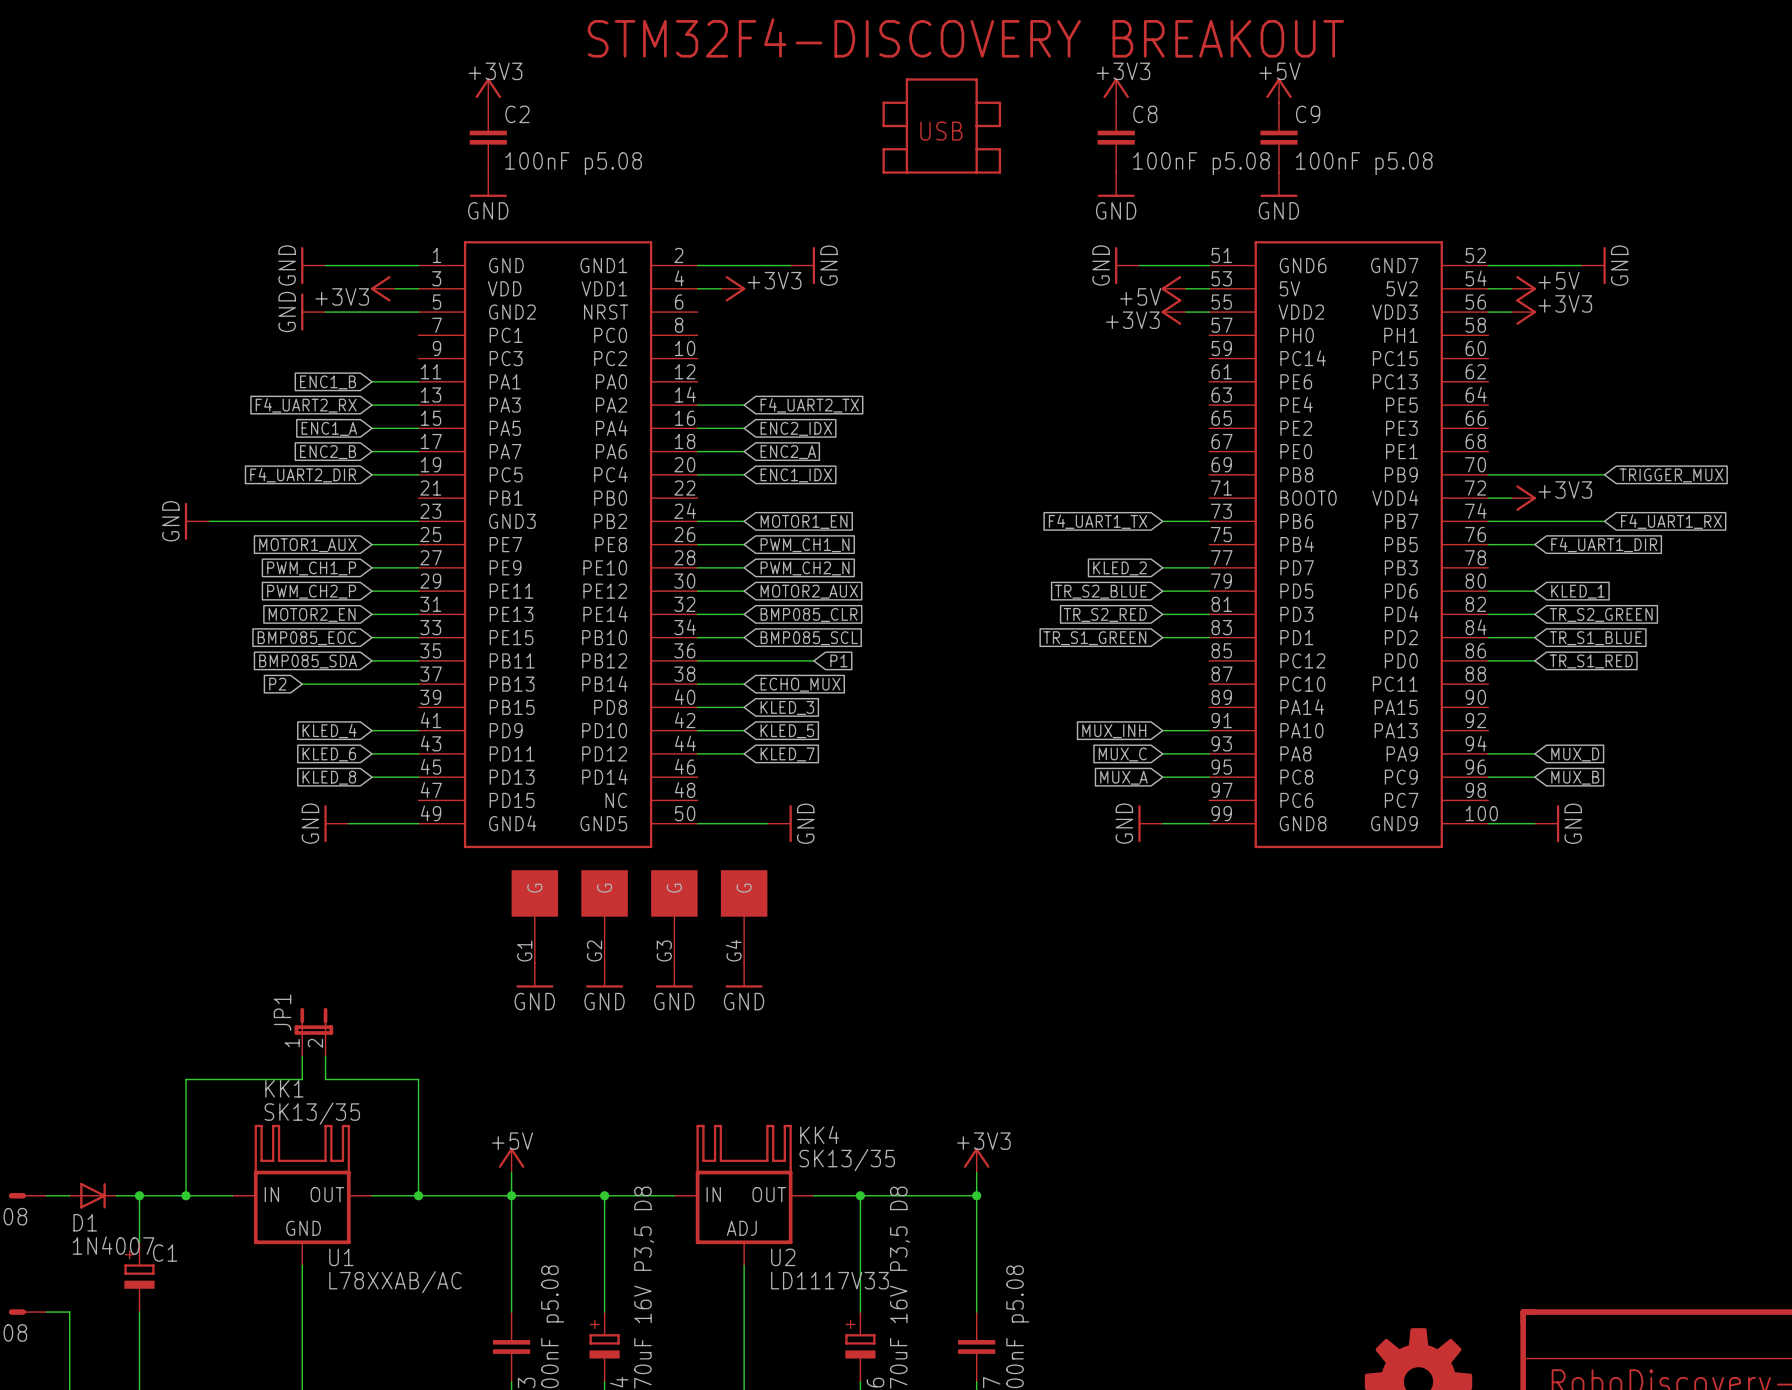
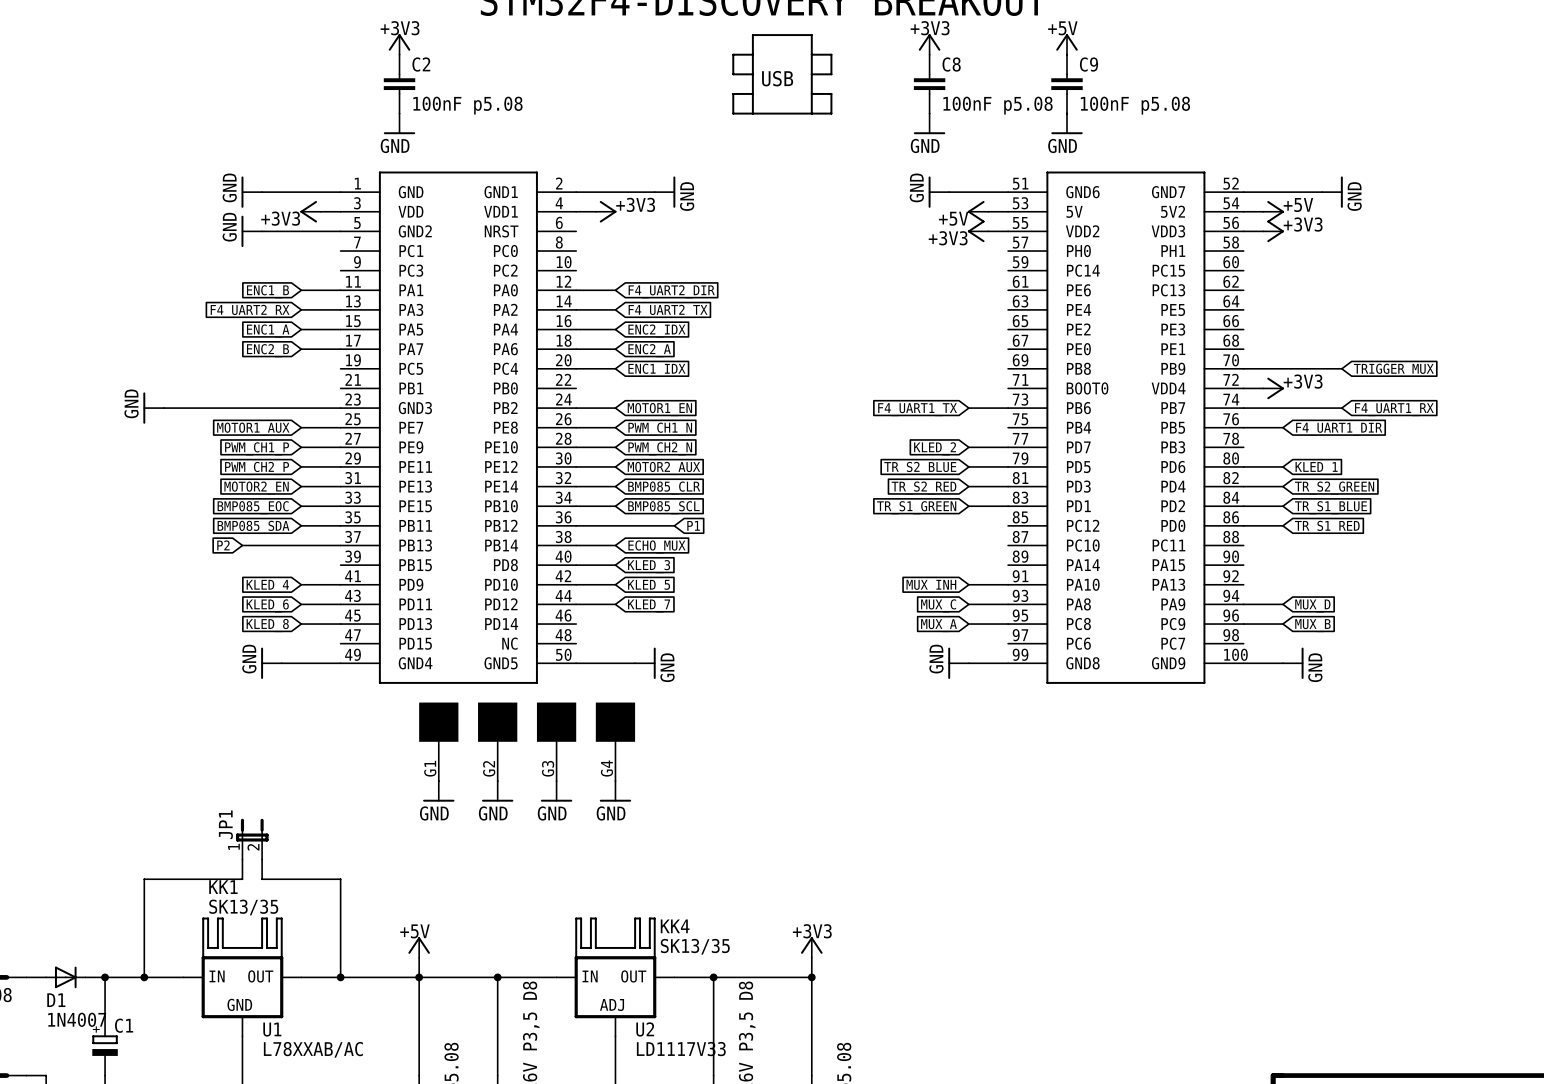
wire: none -> (576, 290) (615, 290)
global label: none -> F4_UART2_DIR (671, 291)
wire: (372, 474) (418, 474) -> none
global label: F4_UART2_DIR (303, 475) -> none

